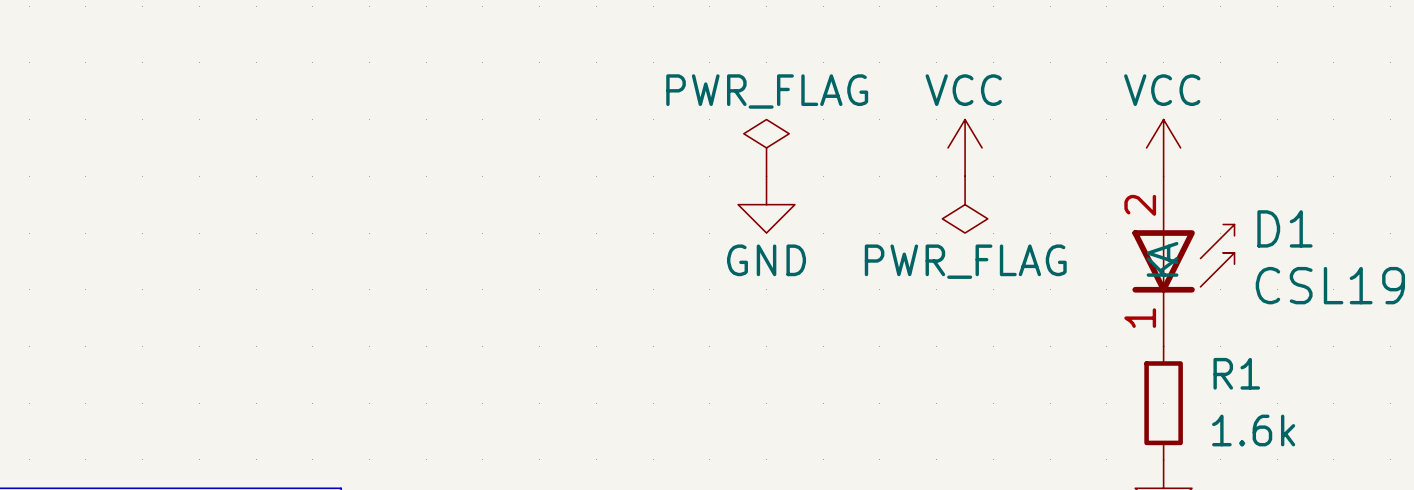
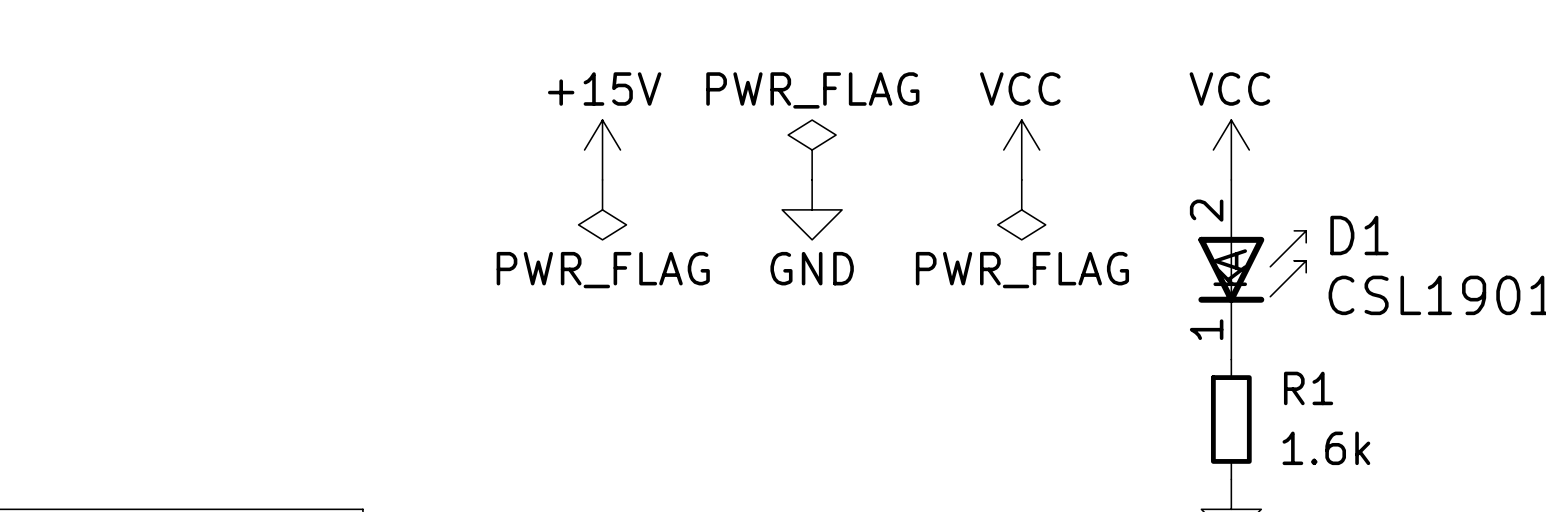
power symbol: none -> +15V (602, 150)
power symbol: none -> PWR_FLAG (602, 209)

